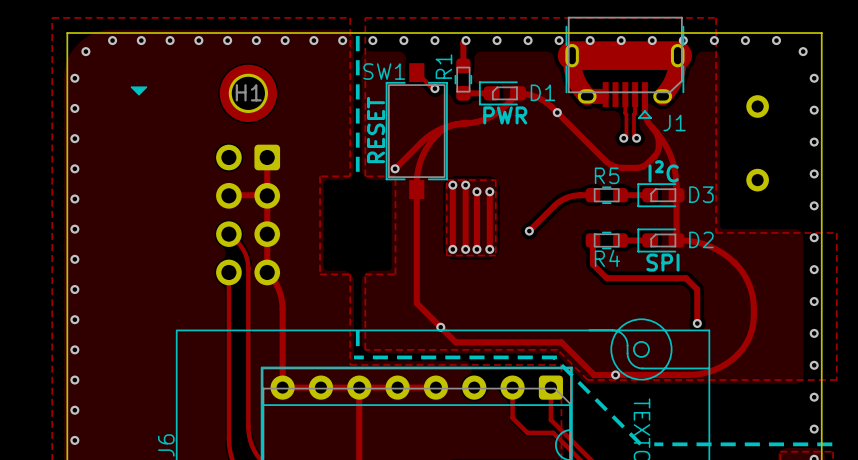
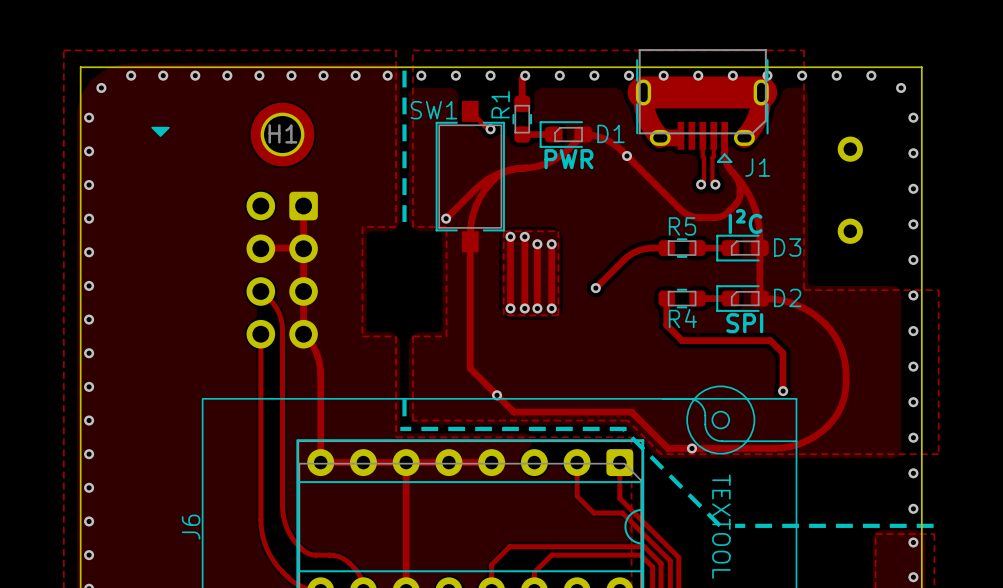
SW1 value: RESET (376, 130) -> none

